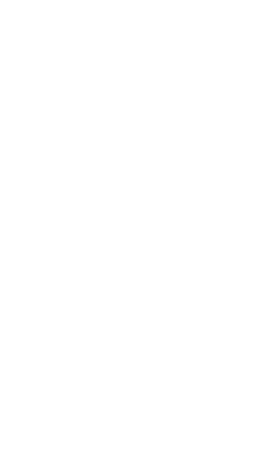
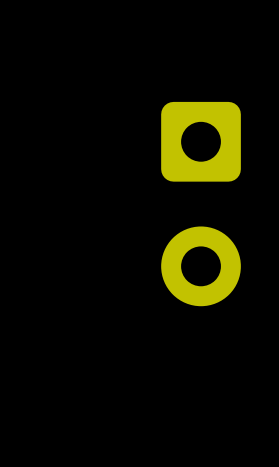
part: none -> (201, 204)

